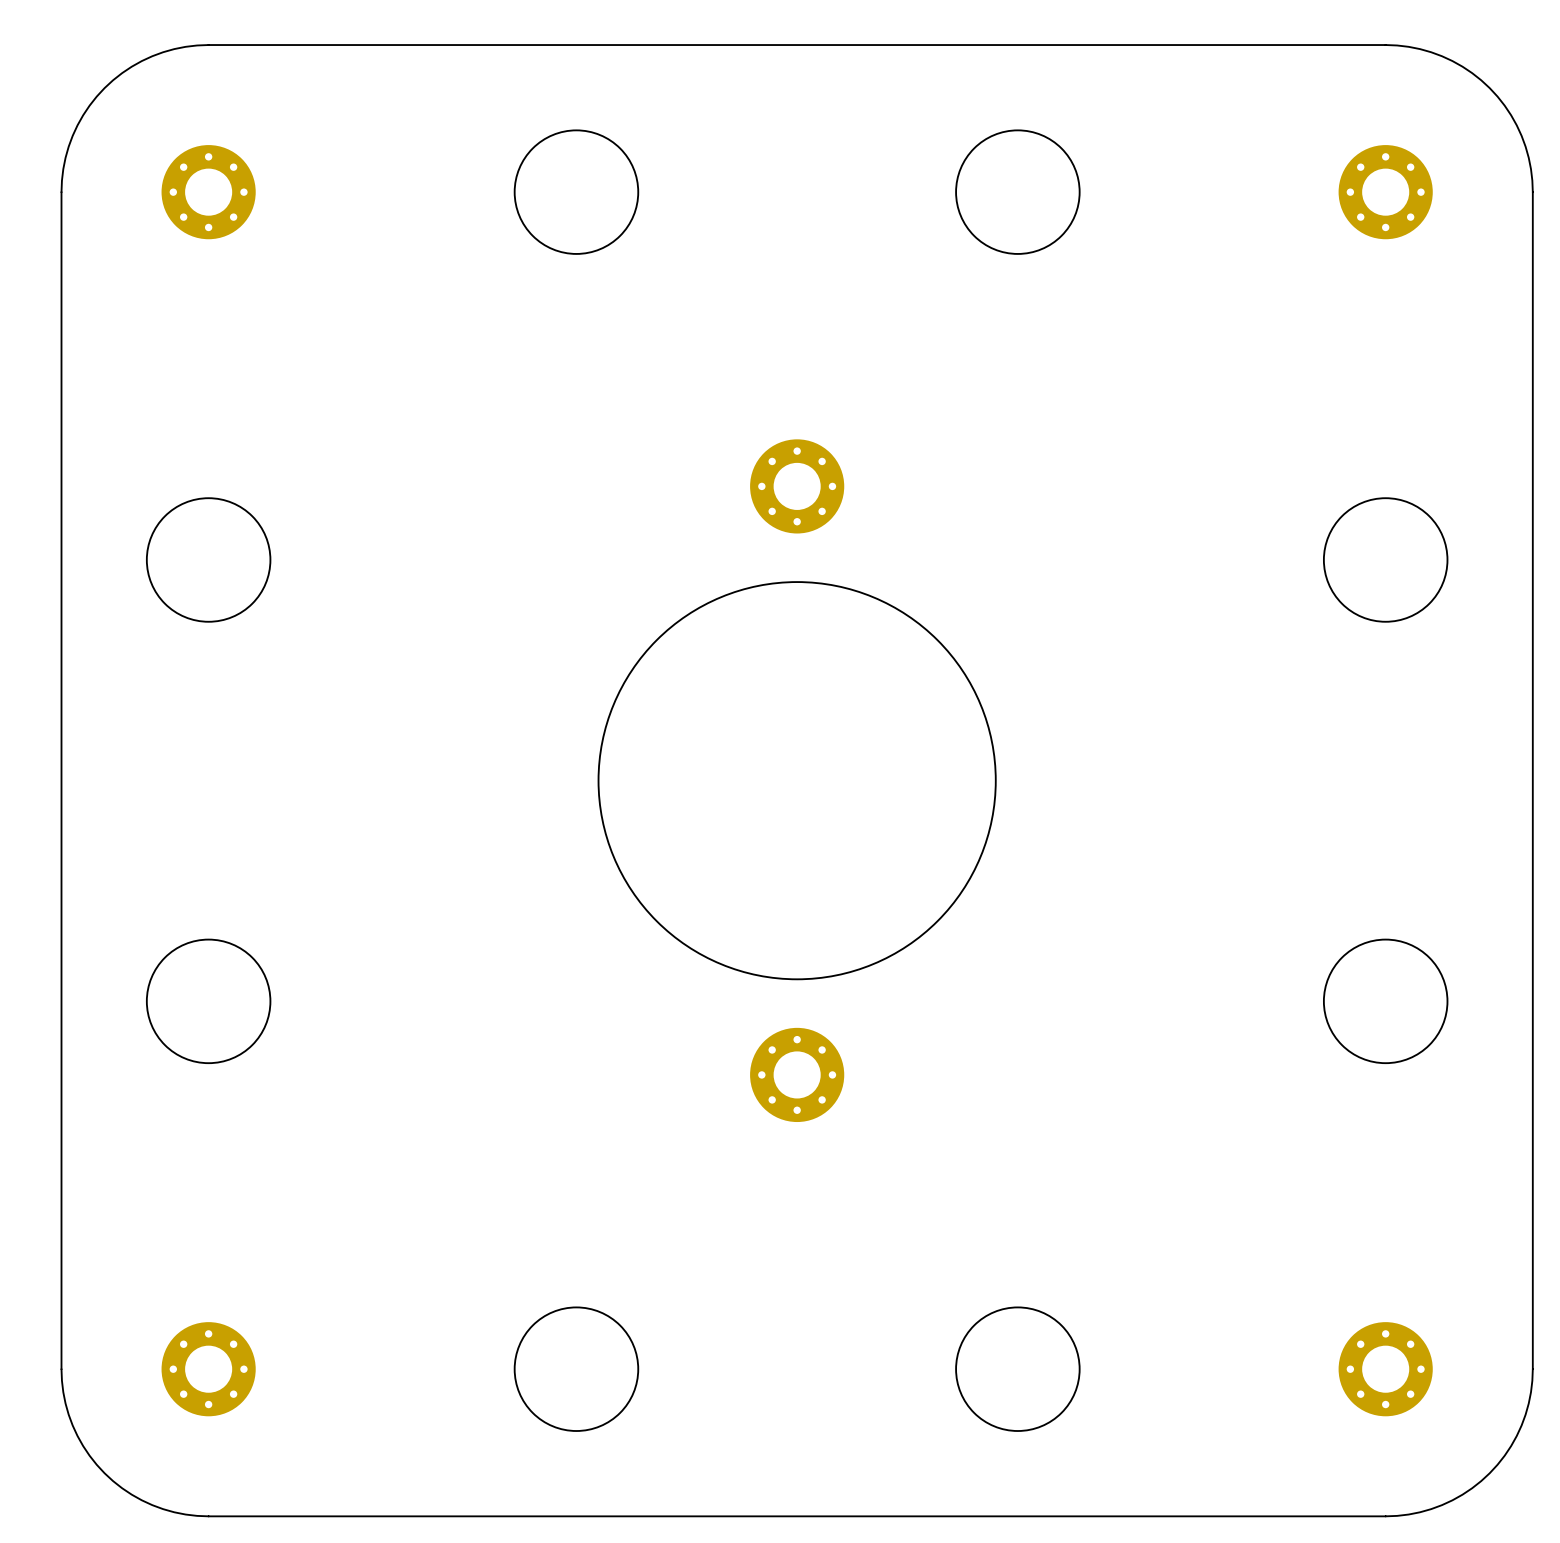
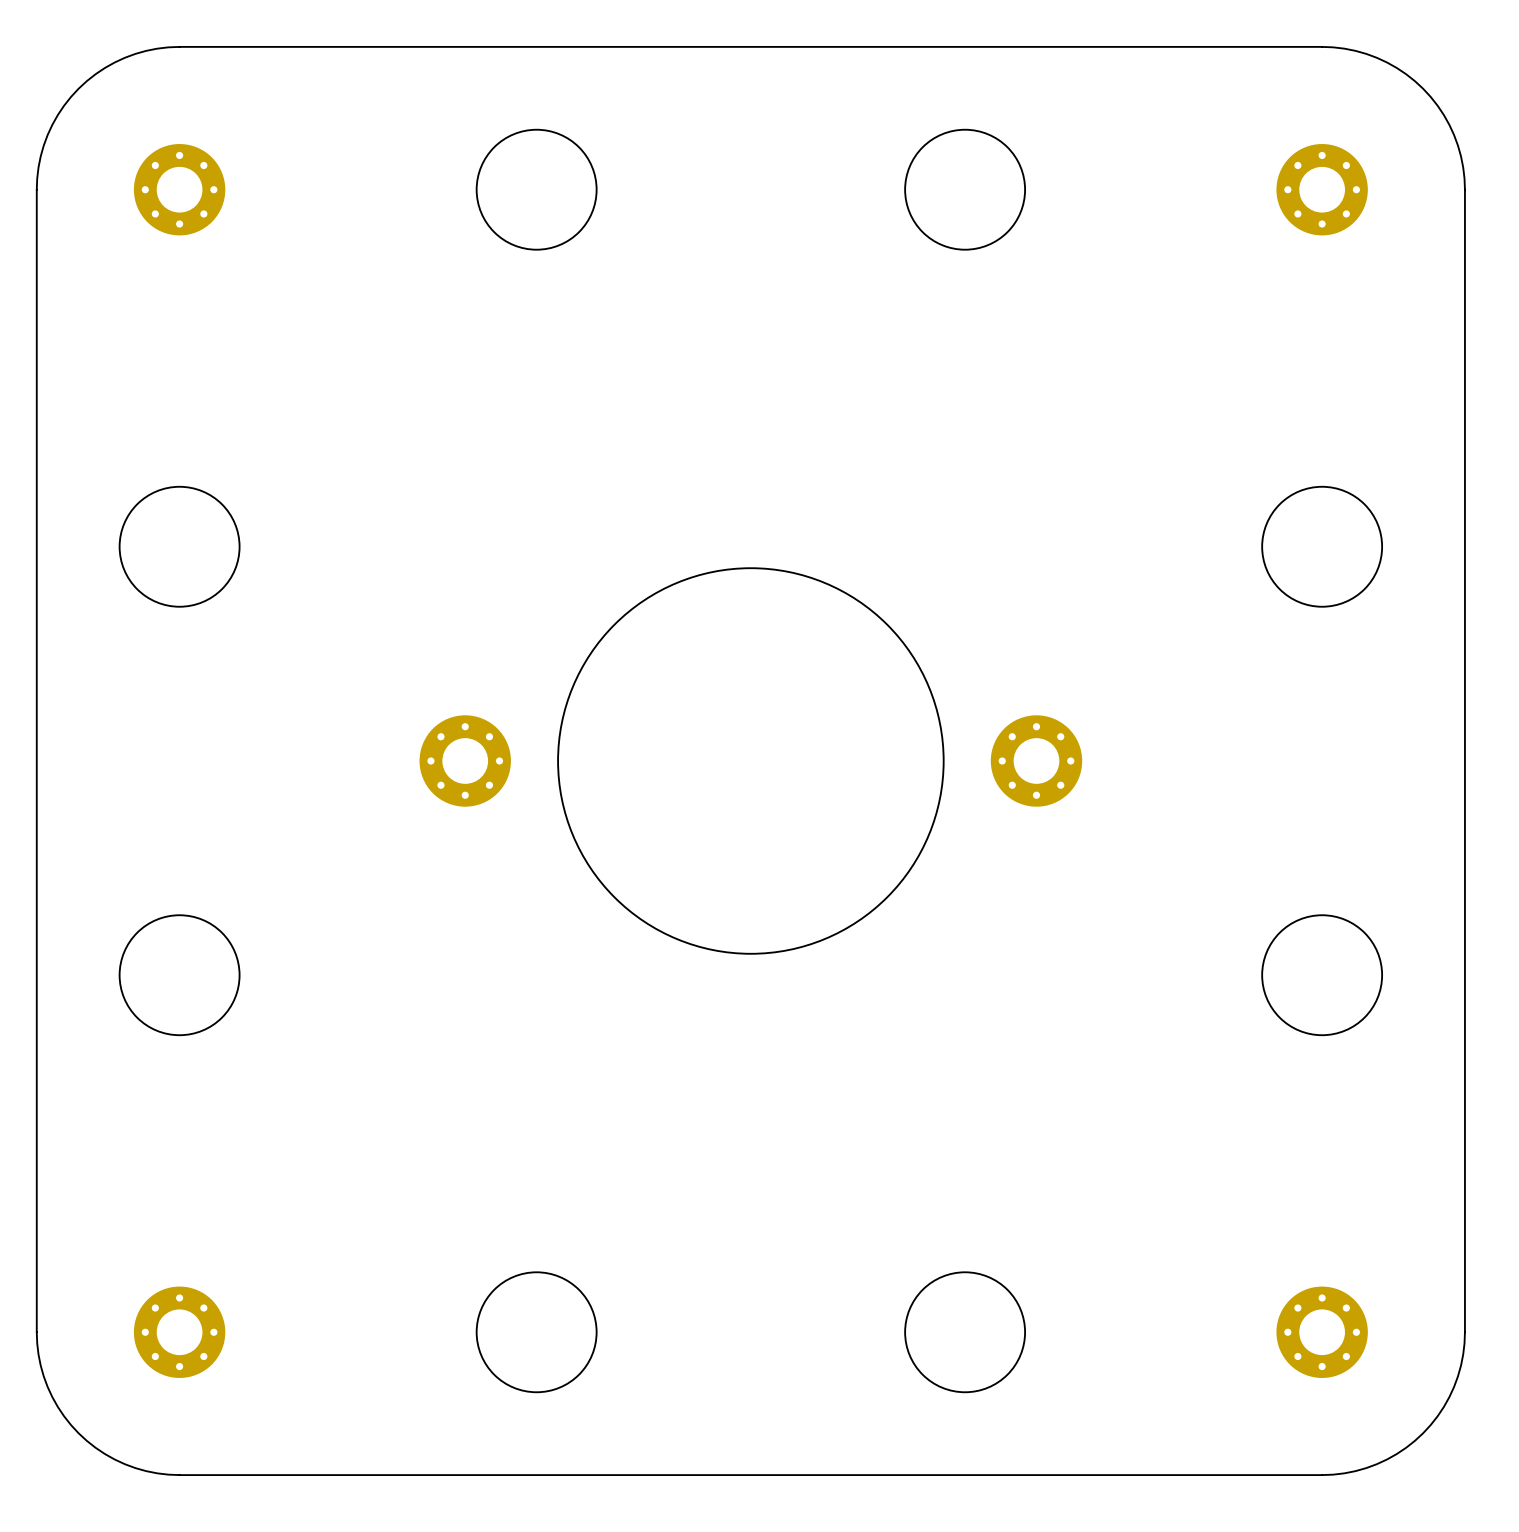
part: (797, 486) -> none
part: none -> (465, 760)
part: none -> (1036, 760)
part: (797, 1074) -> none

